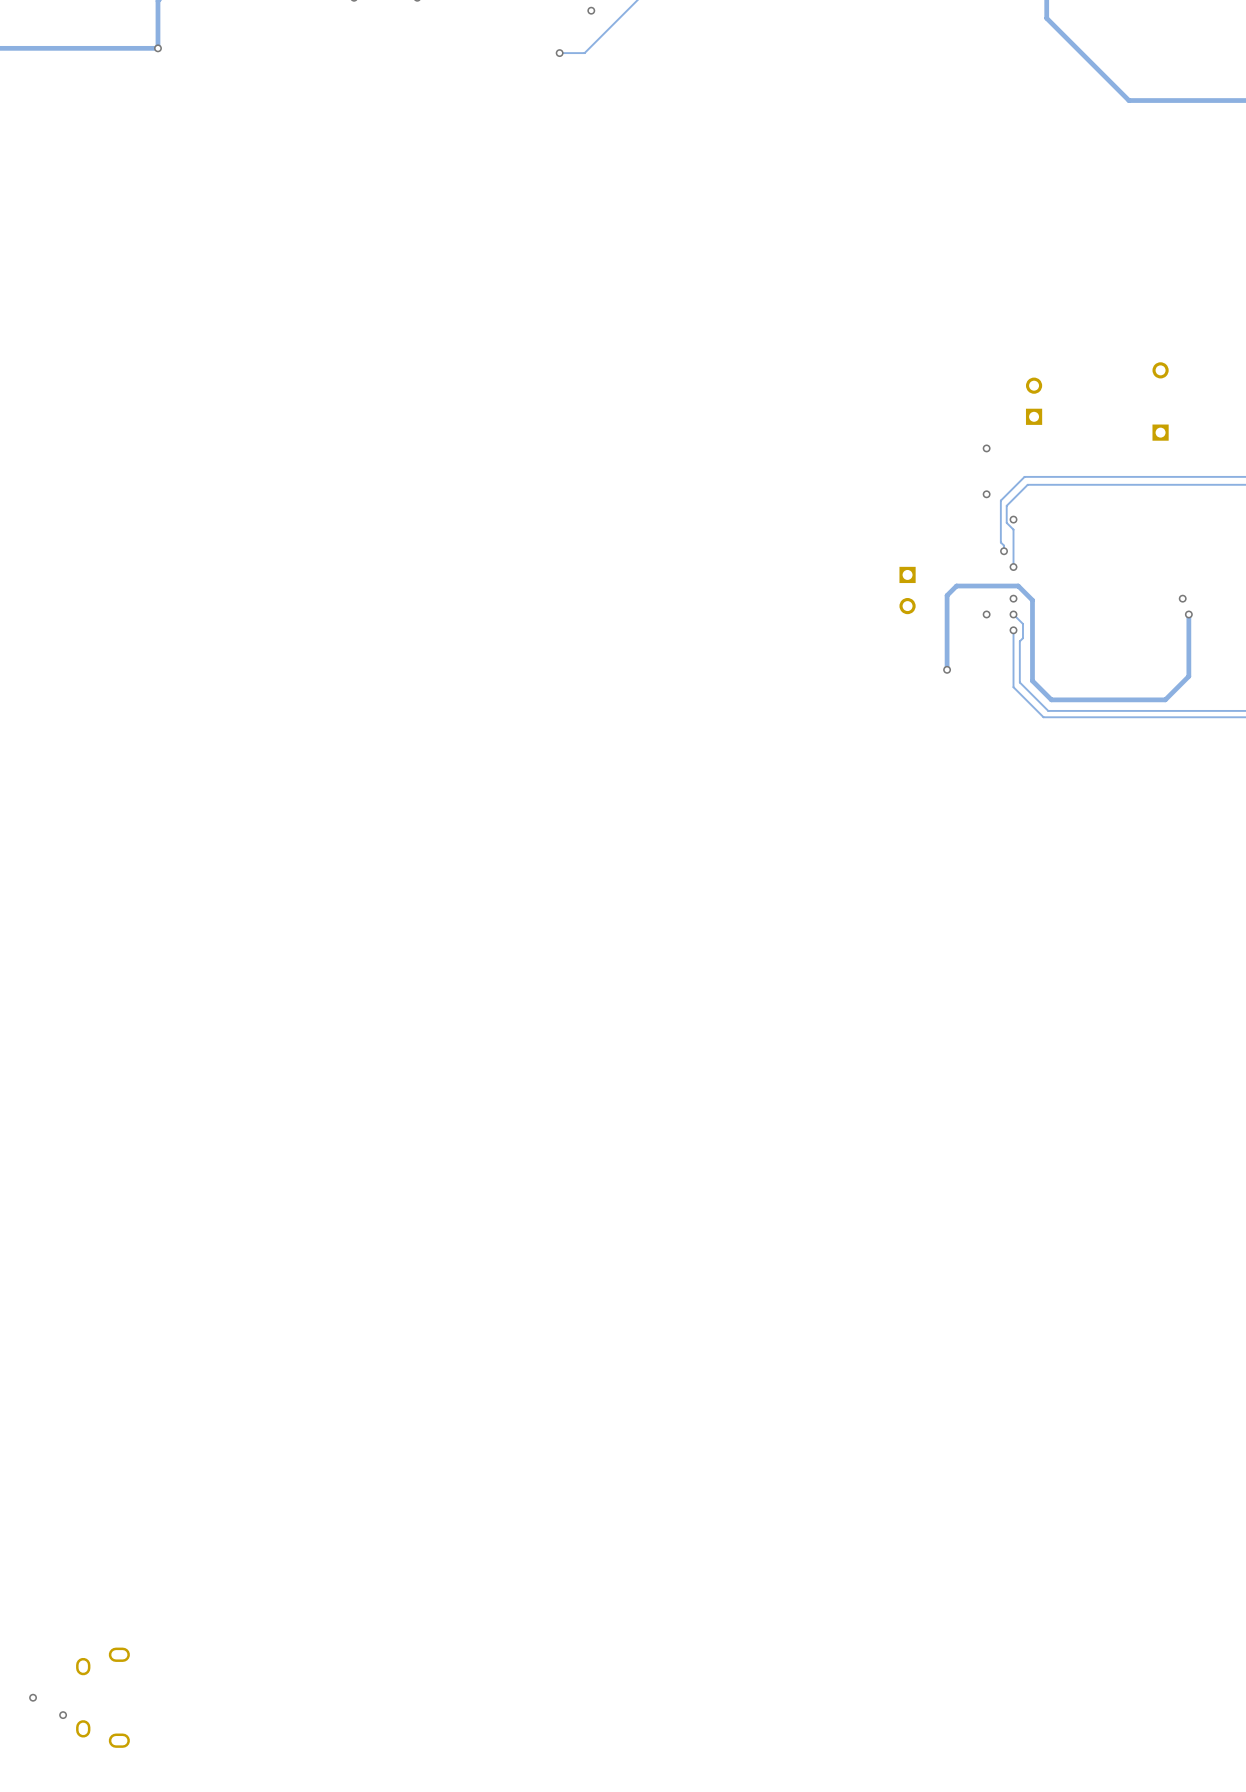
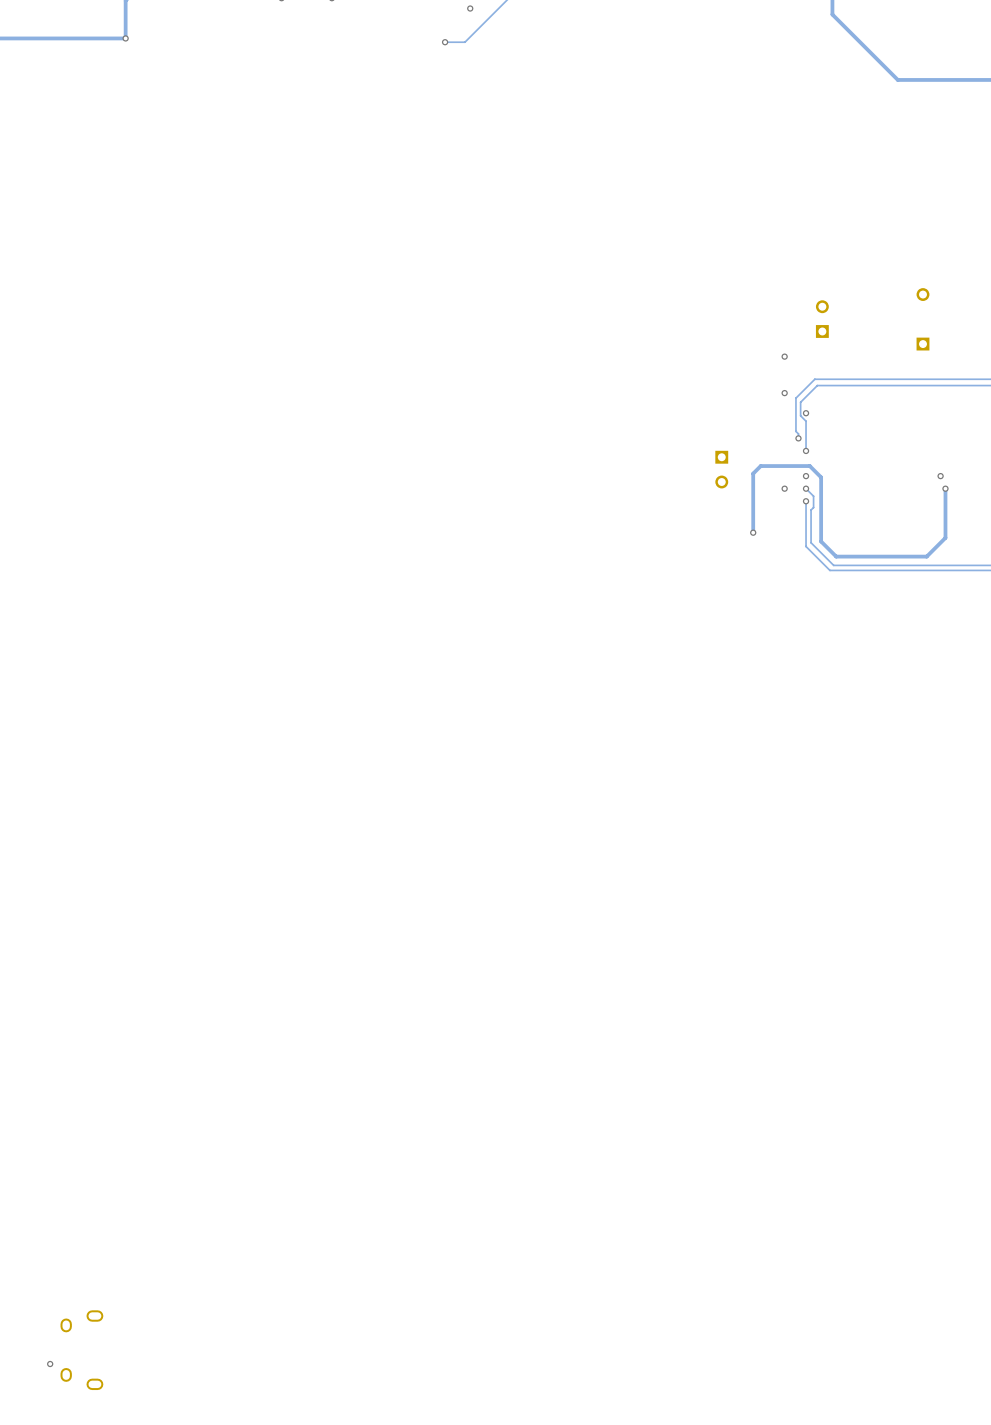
via: (33, 1697) -> none

